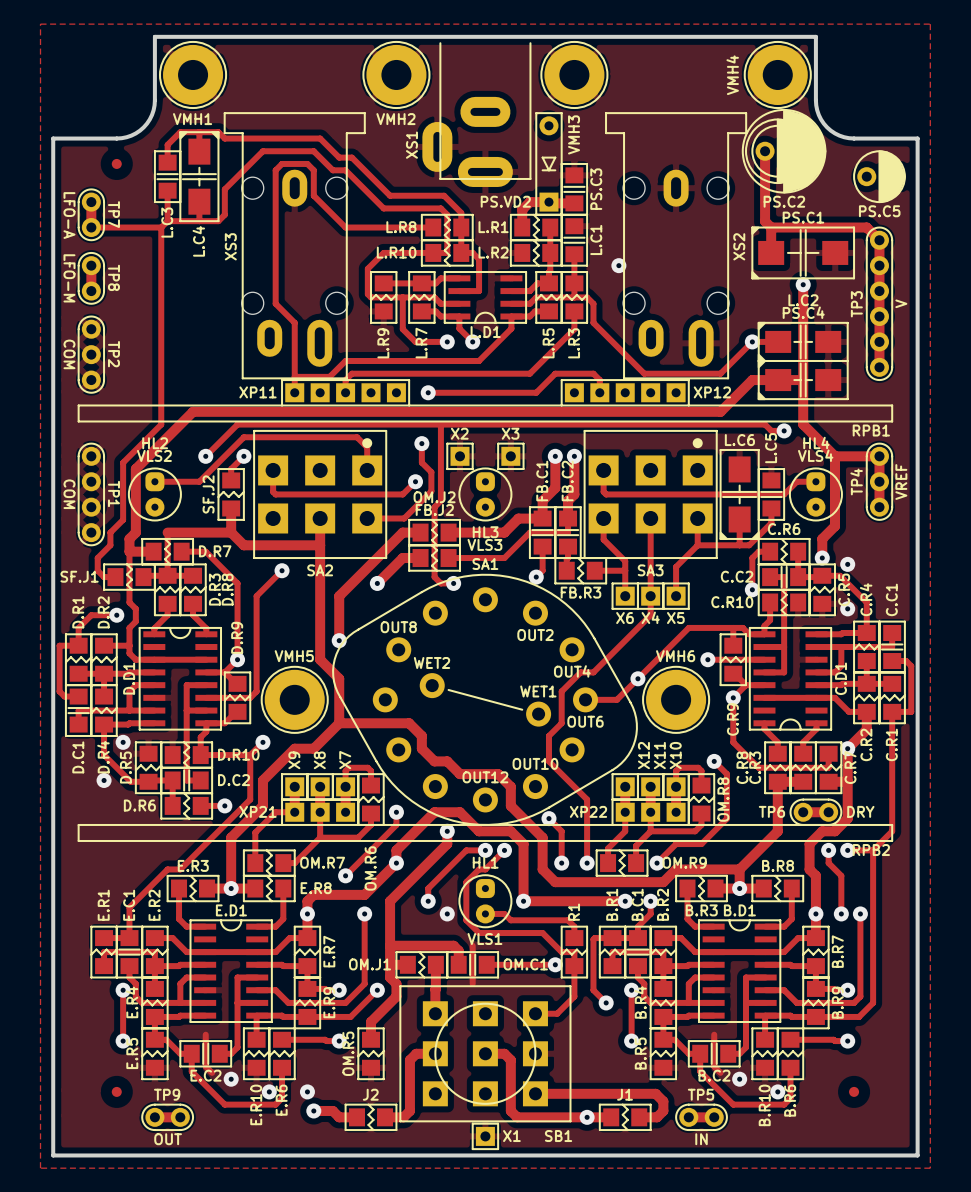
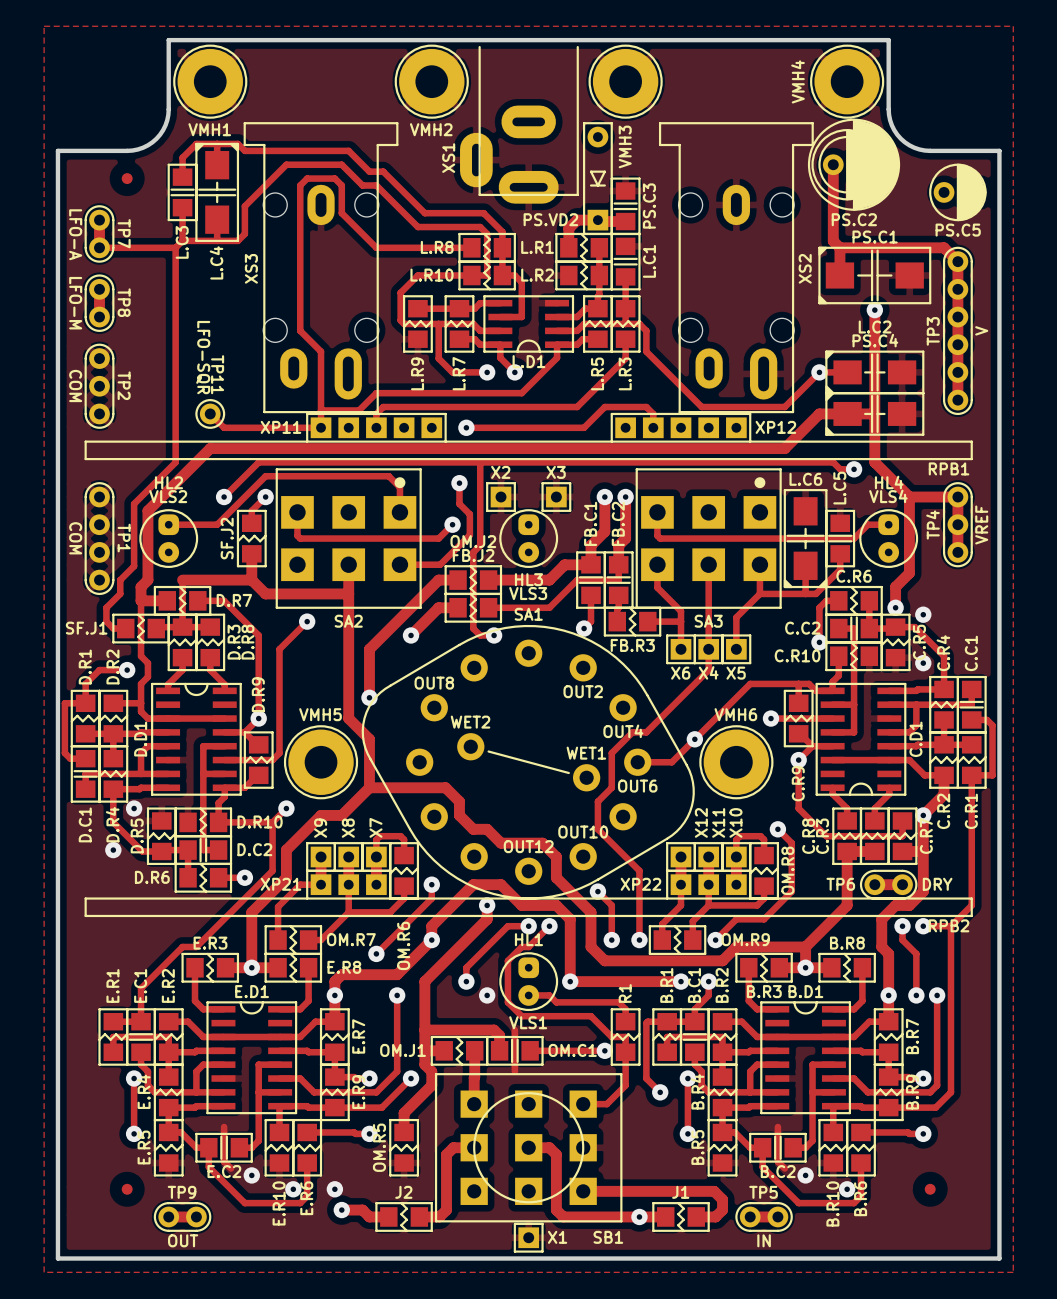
via: (618, 265) -> none
track: none -> (210, 413) (224, 427) (321, 427)
TP11: none -> LFO-SQR (210, 413)

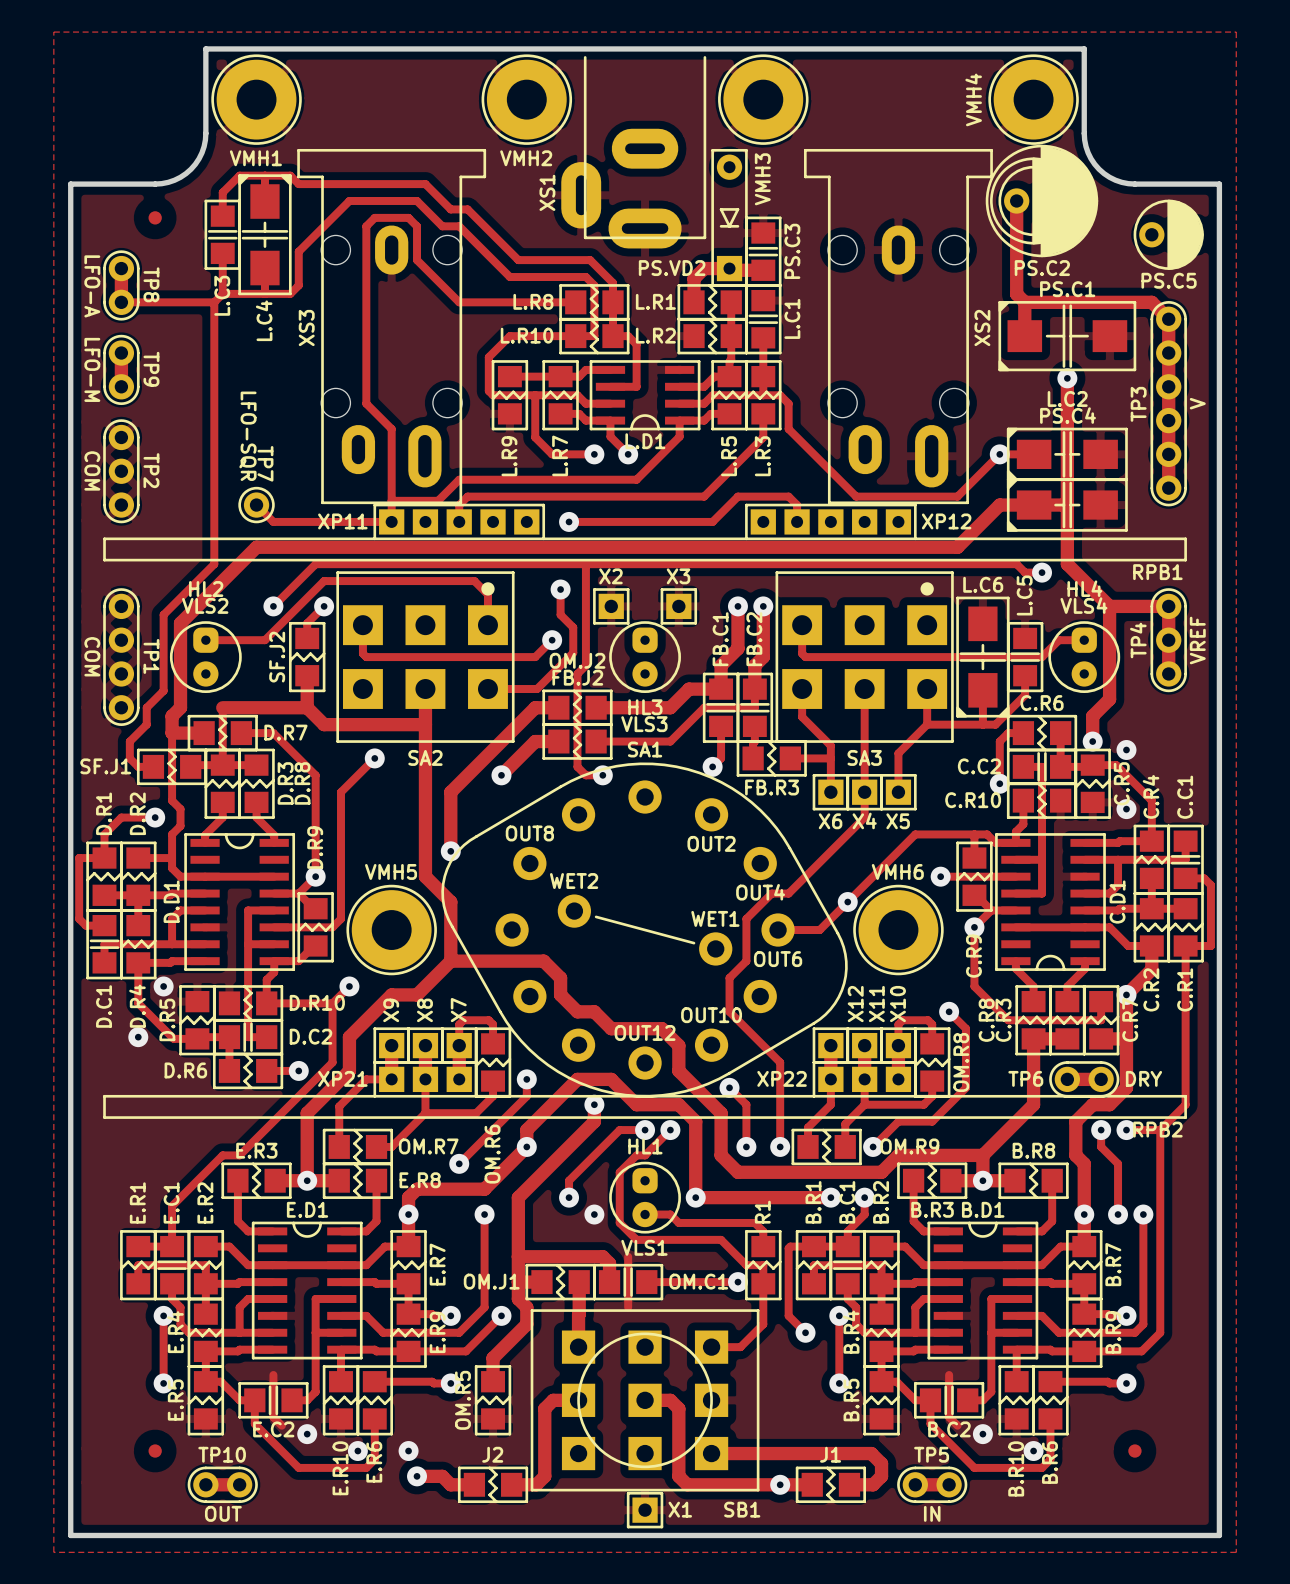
TP7 name: TP7 (124, 233) -> TP8 (151, 284)
TP8 name: TP8 (124, 302) -> TP9 (151, 369)
TP11 name: TP11 (217, 374) -> TP7 (265, 463)
TP9 name: TP9 (182, 1192) -> TP10 (222, 1454)

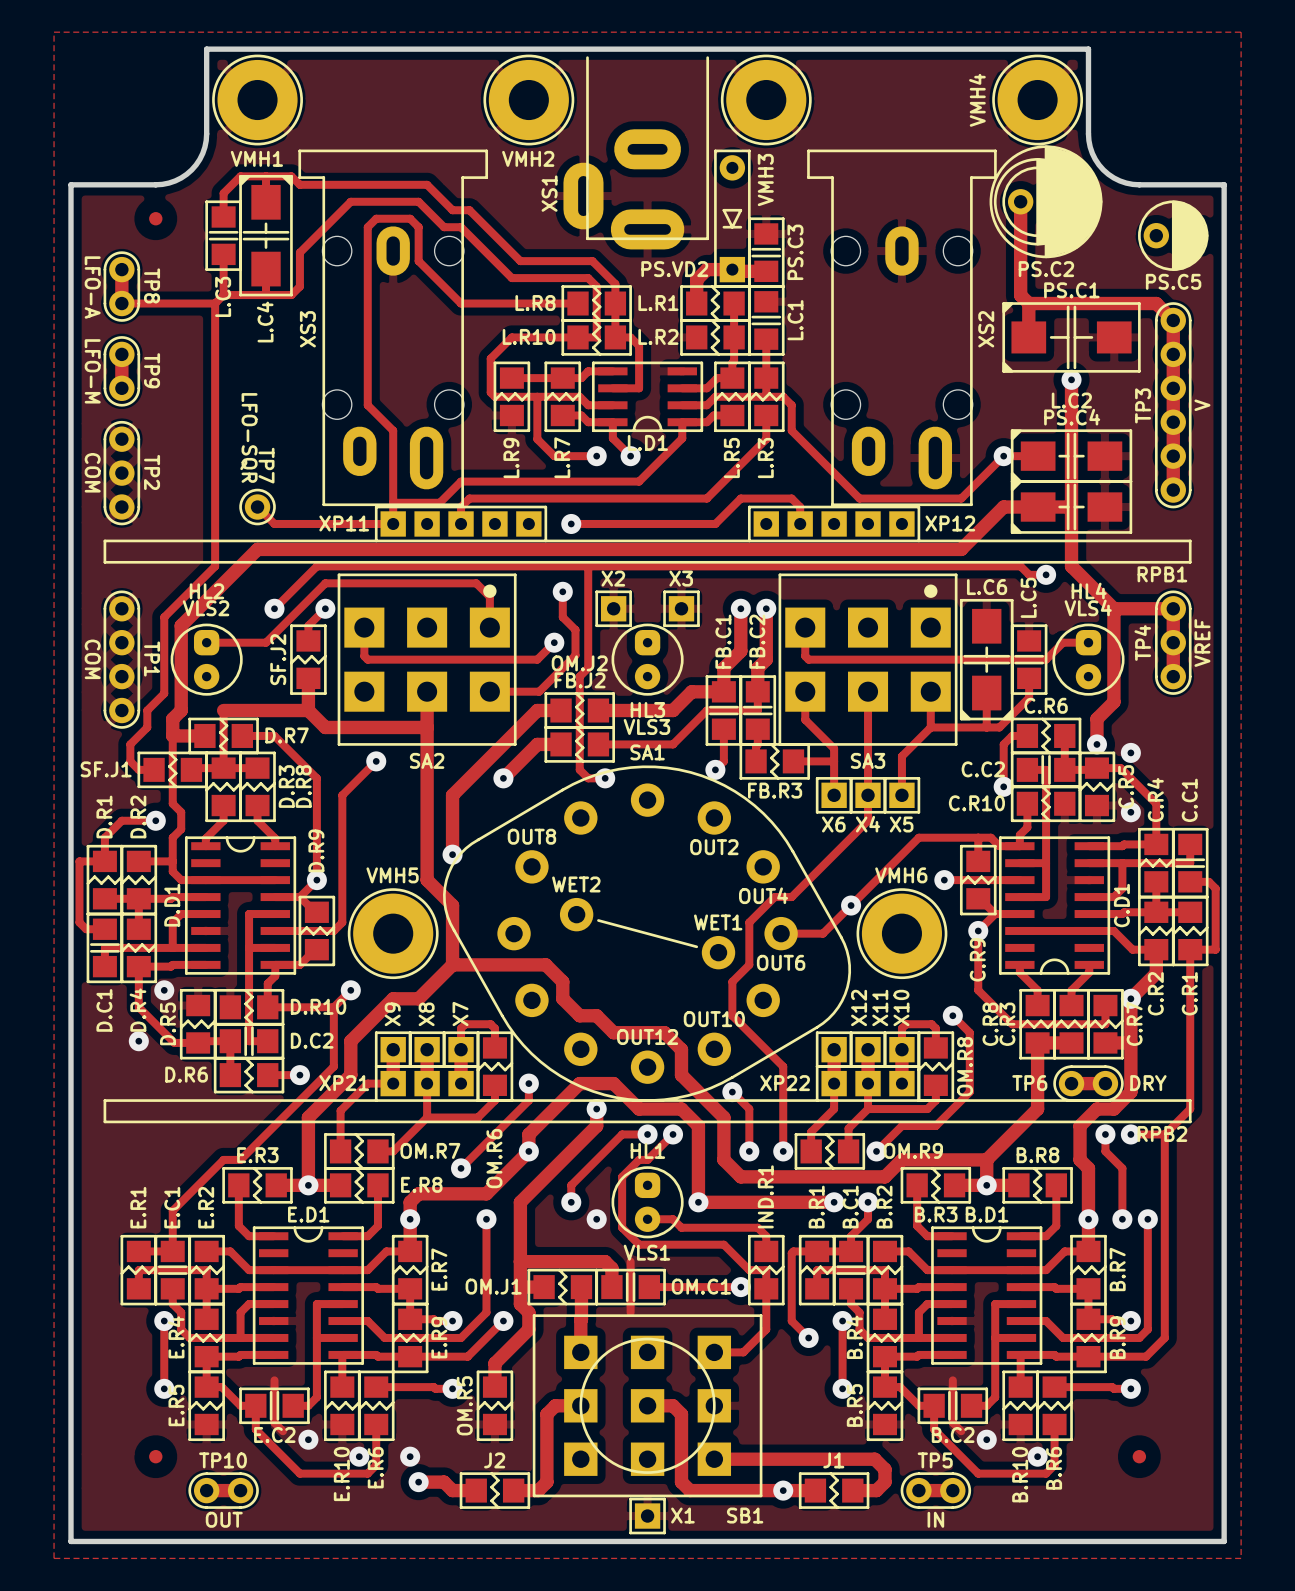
R1 name: R1 (762, 1212) -> IND.R1 (765, 1196)

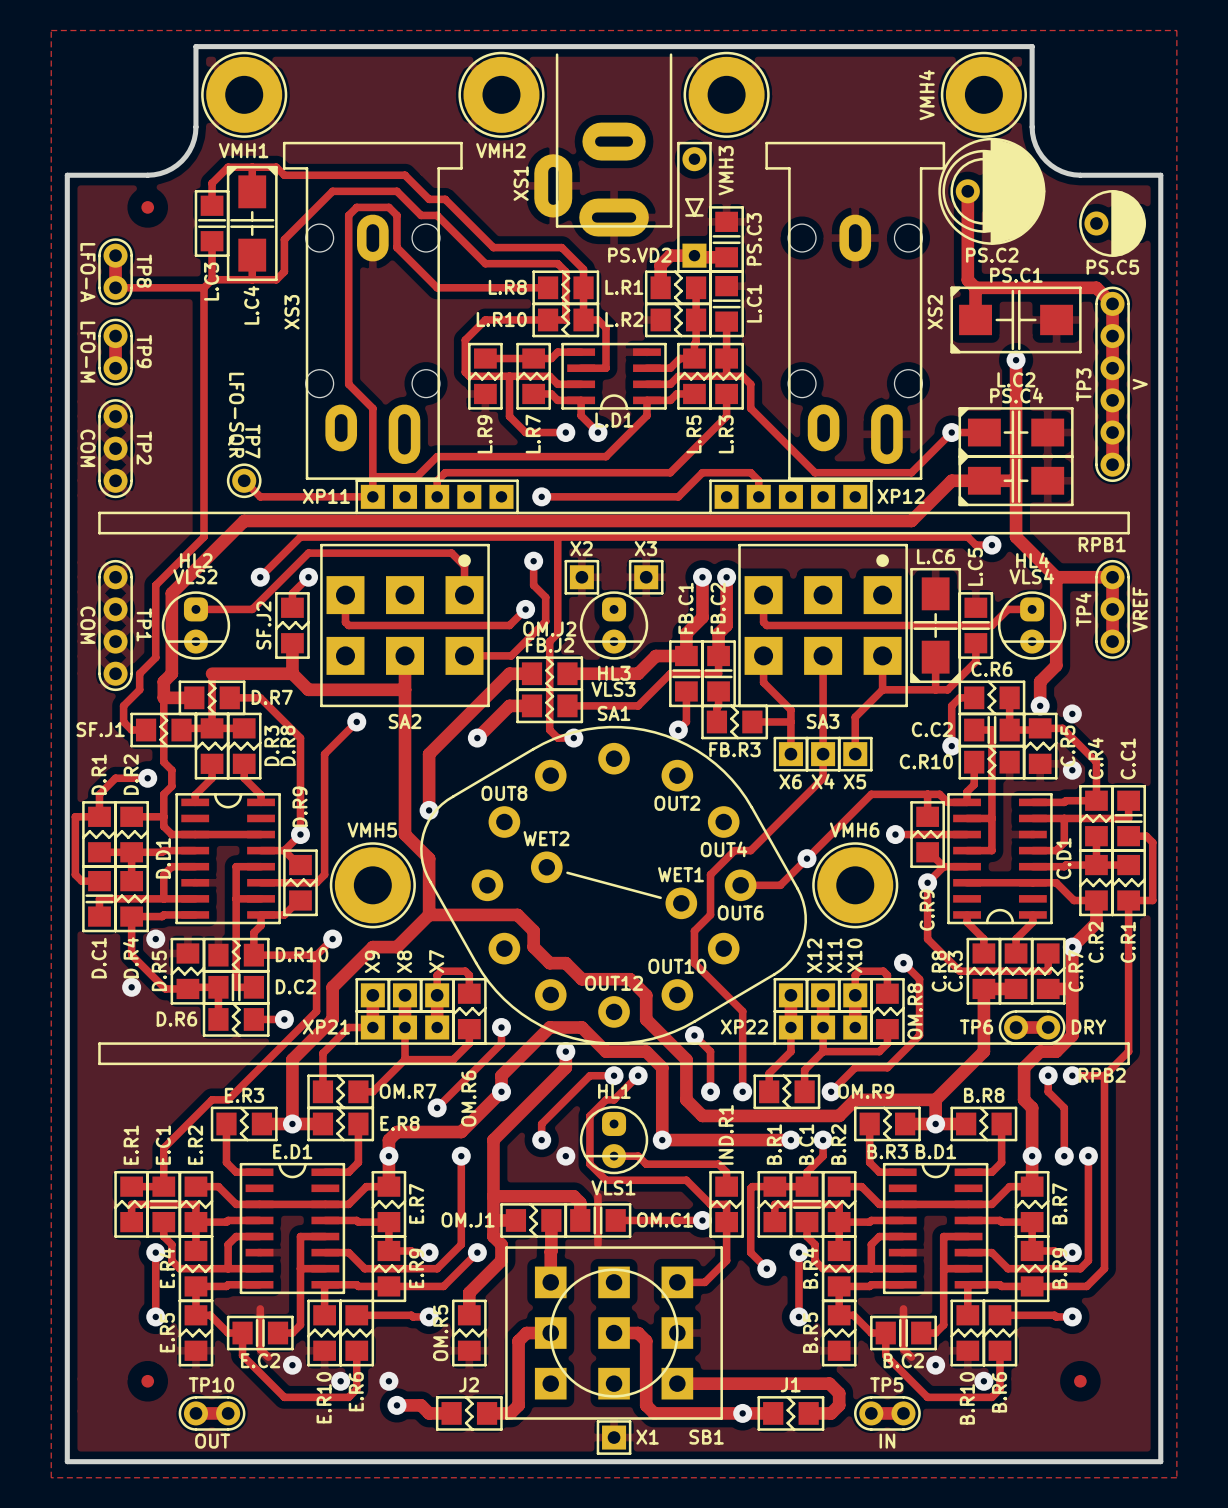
VLS2 footprint: [170, 623, 243, 696] -> [161, 591, 231, 660]
VLS3 footprint: [611, 623, 684, 696] -> [579, 591, 649, 660]
VLS4 footprint: [1052, 623, 1125, 696] -> [997, 591, 1067, 660]
VLS1 footprint: [611, 1166, 684, 1239] -> [579, 1105, 649, 1175]

